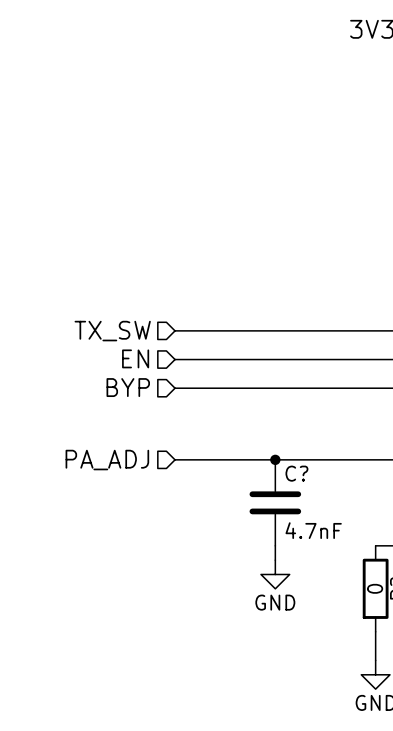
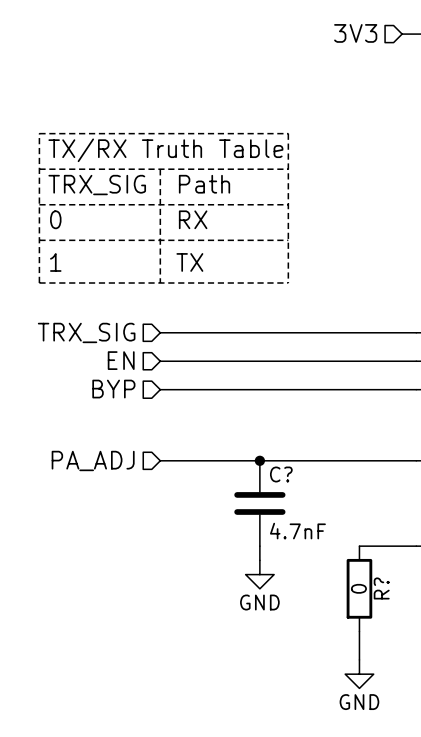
line: none -> (39, 133) (288, 133) (288, 283) (39, 283) (39, 133)
text: none -> TX/RX Truth Table (165, 150)
line: none -> (39, 169) (288, 169)
line: none -> (160, 169) (160, 283)
text: none -> Path (204, 184)
text: none -> TRX_SIG (97, 185)
line: none -> (39, 204) (288, 204)
text: none -> 0 (55, 219)
text: none -> RX (193, 219)
line: none -> (39, 240) (288, 240)
text: none -> 1 (55, 262)
text: none -> TX (189, 262)
hierarchical label: TX_SW (112, 331) -> TRX_SIG (86, 332)

